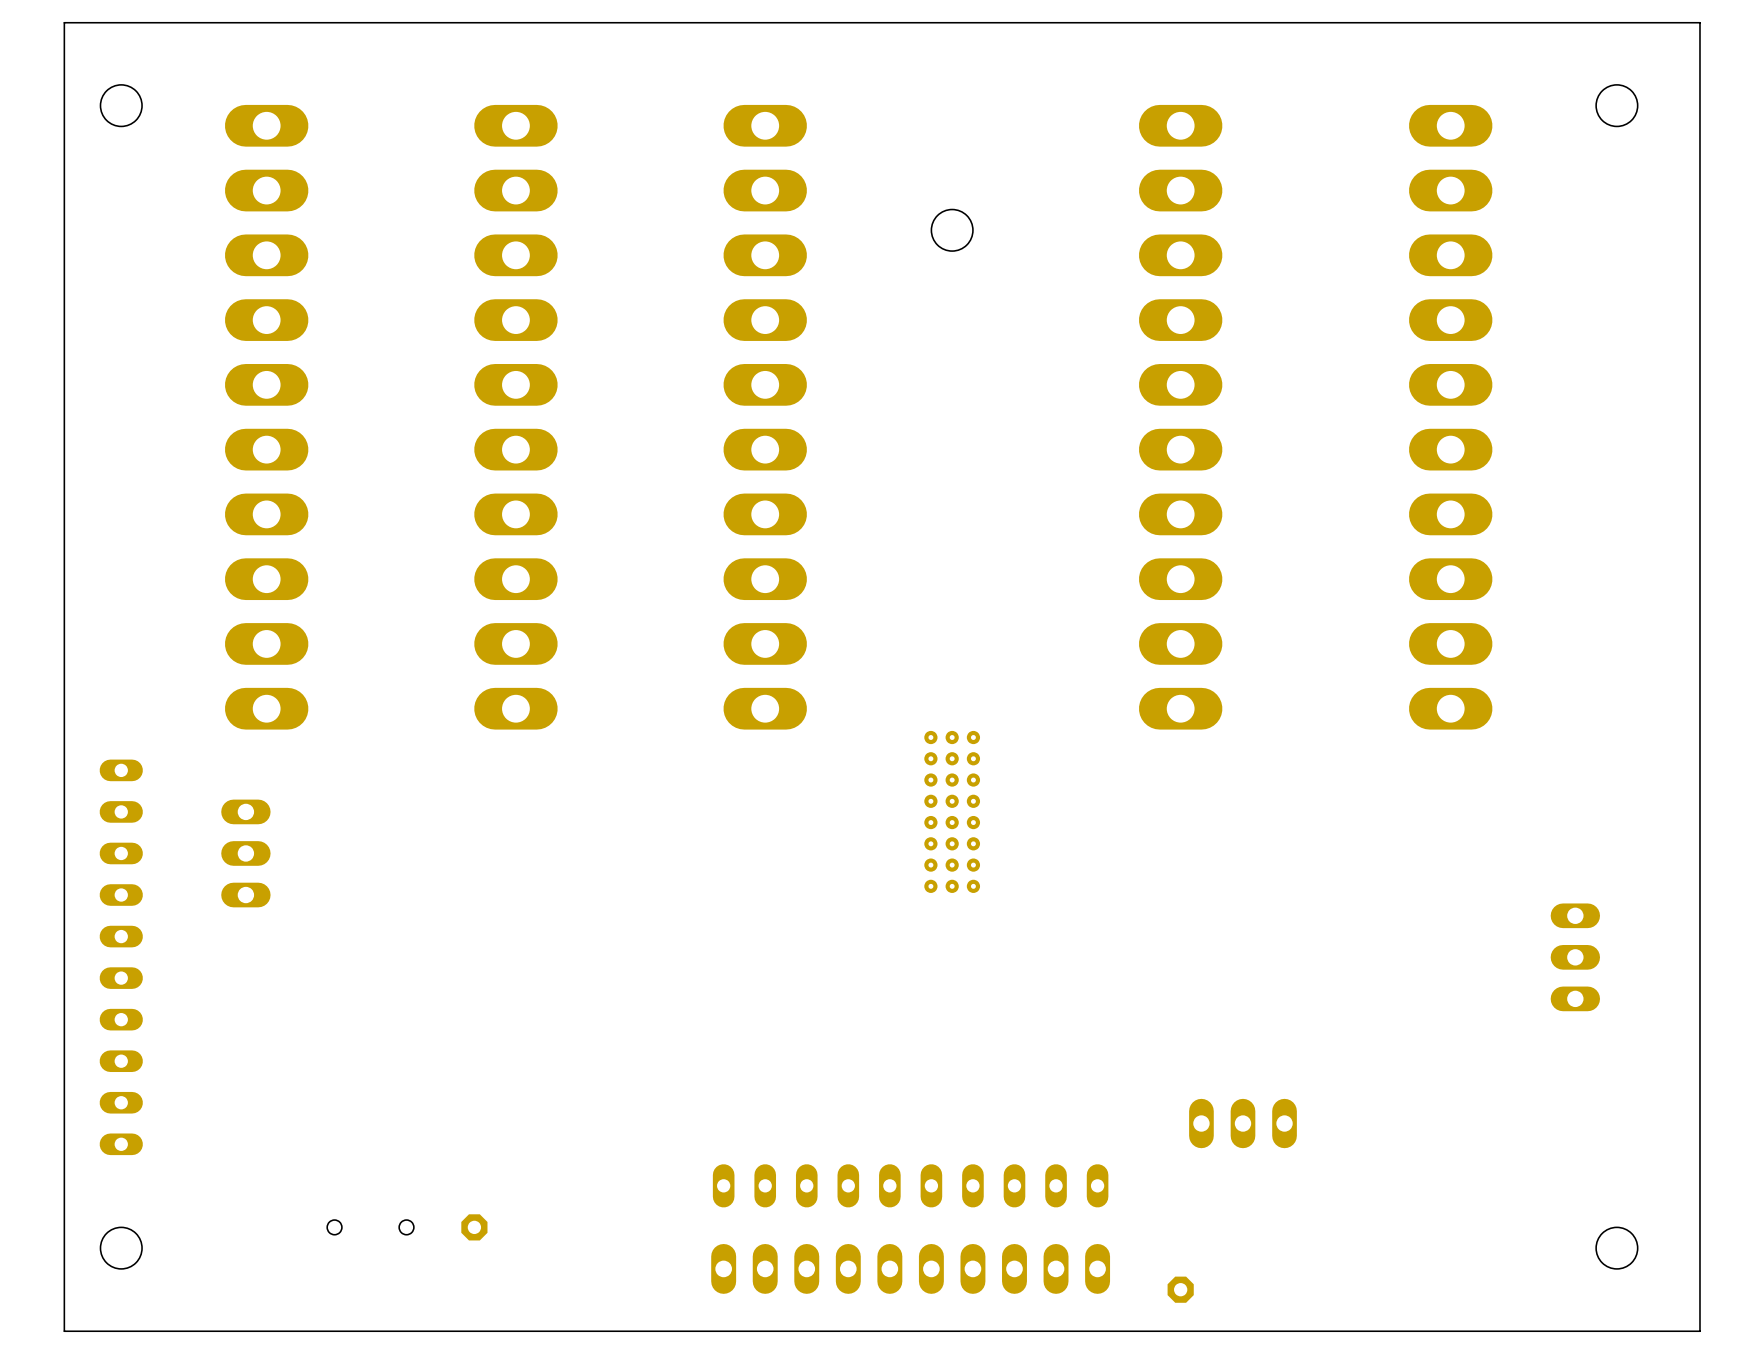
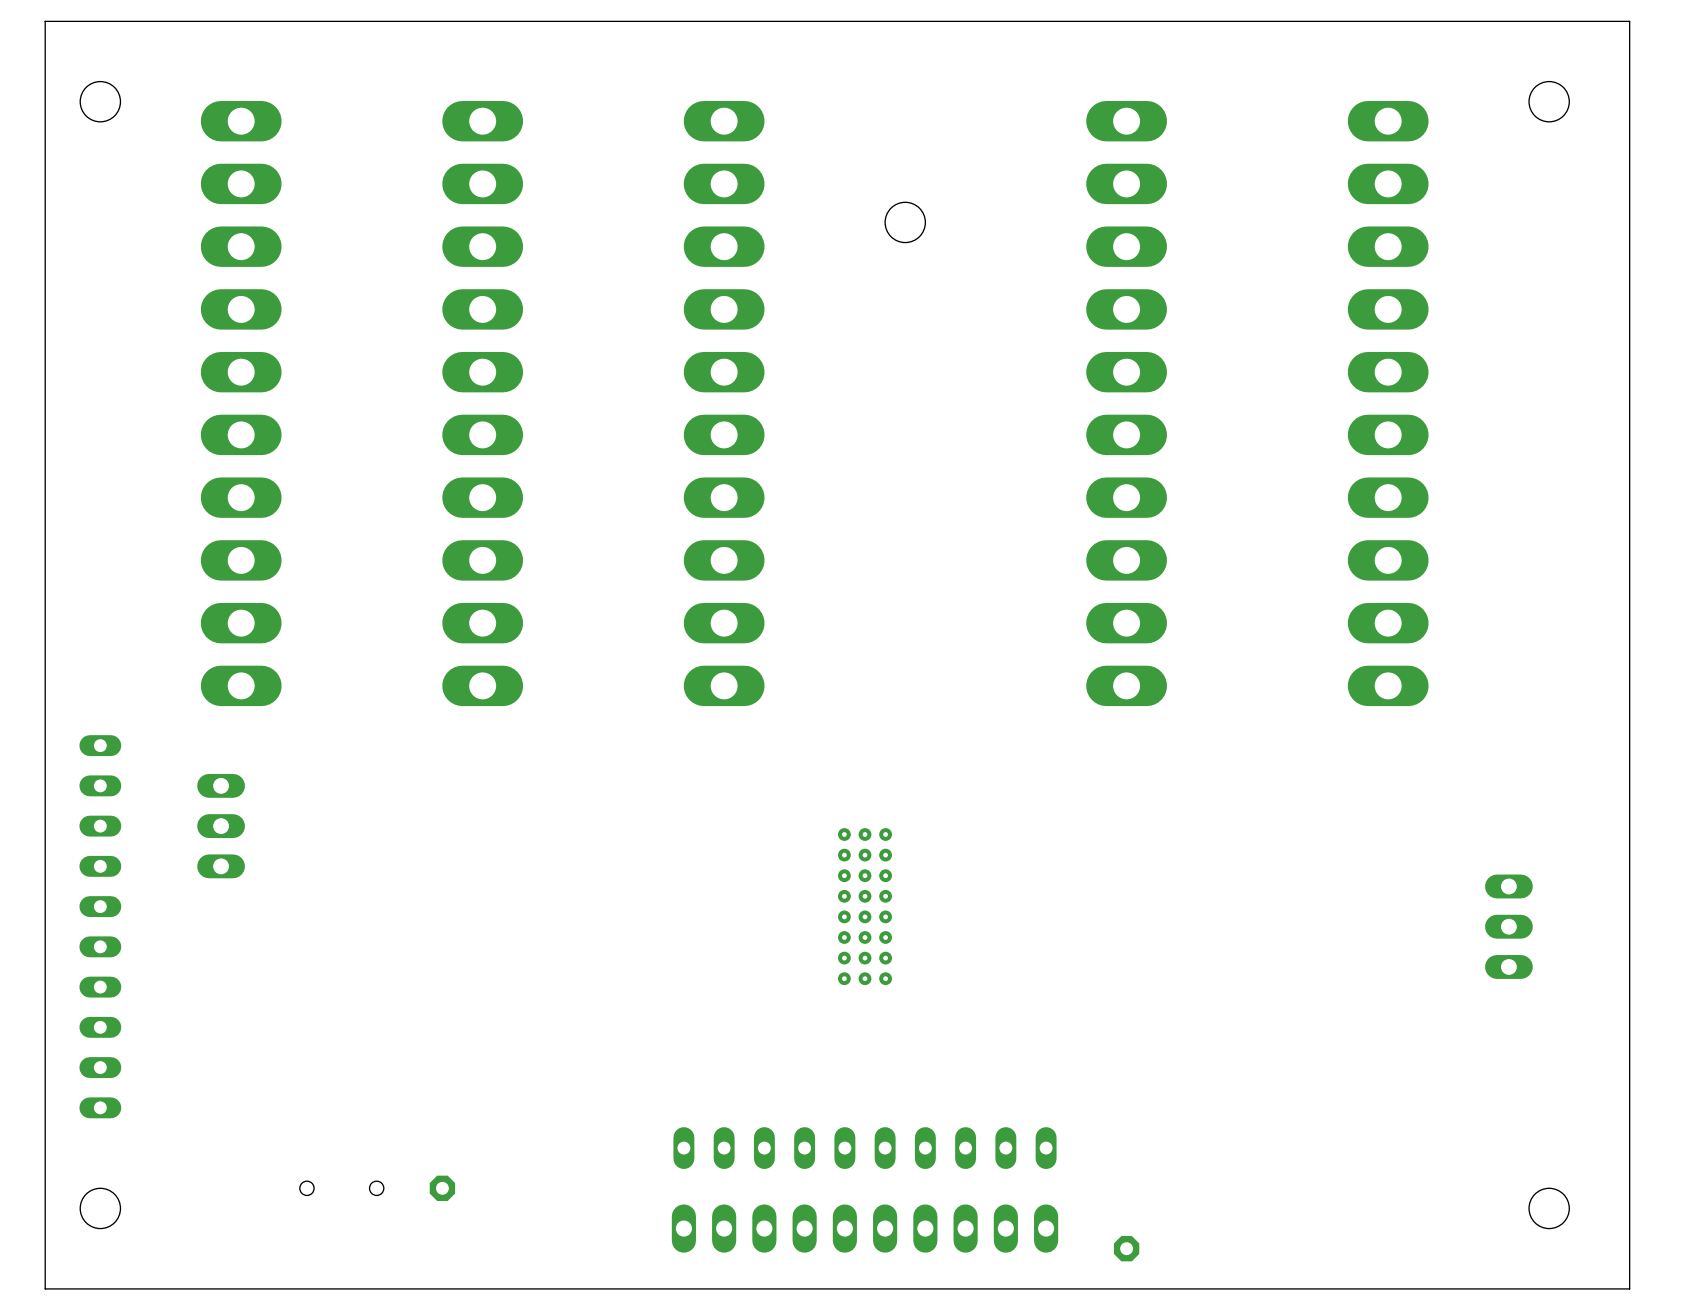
part position: (952, 811) -> (865, 906)
part: (1242, 1123) -> none

